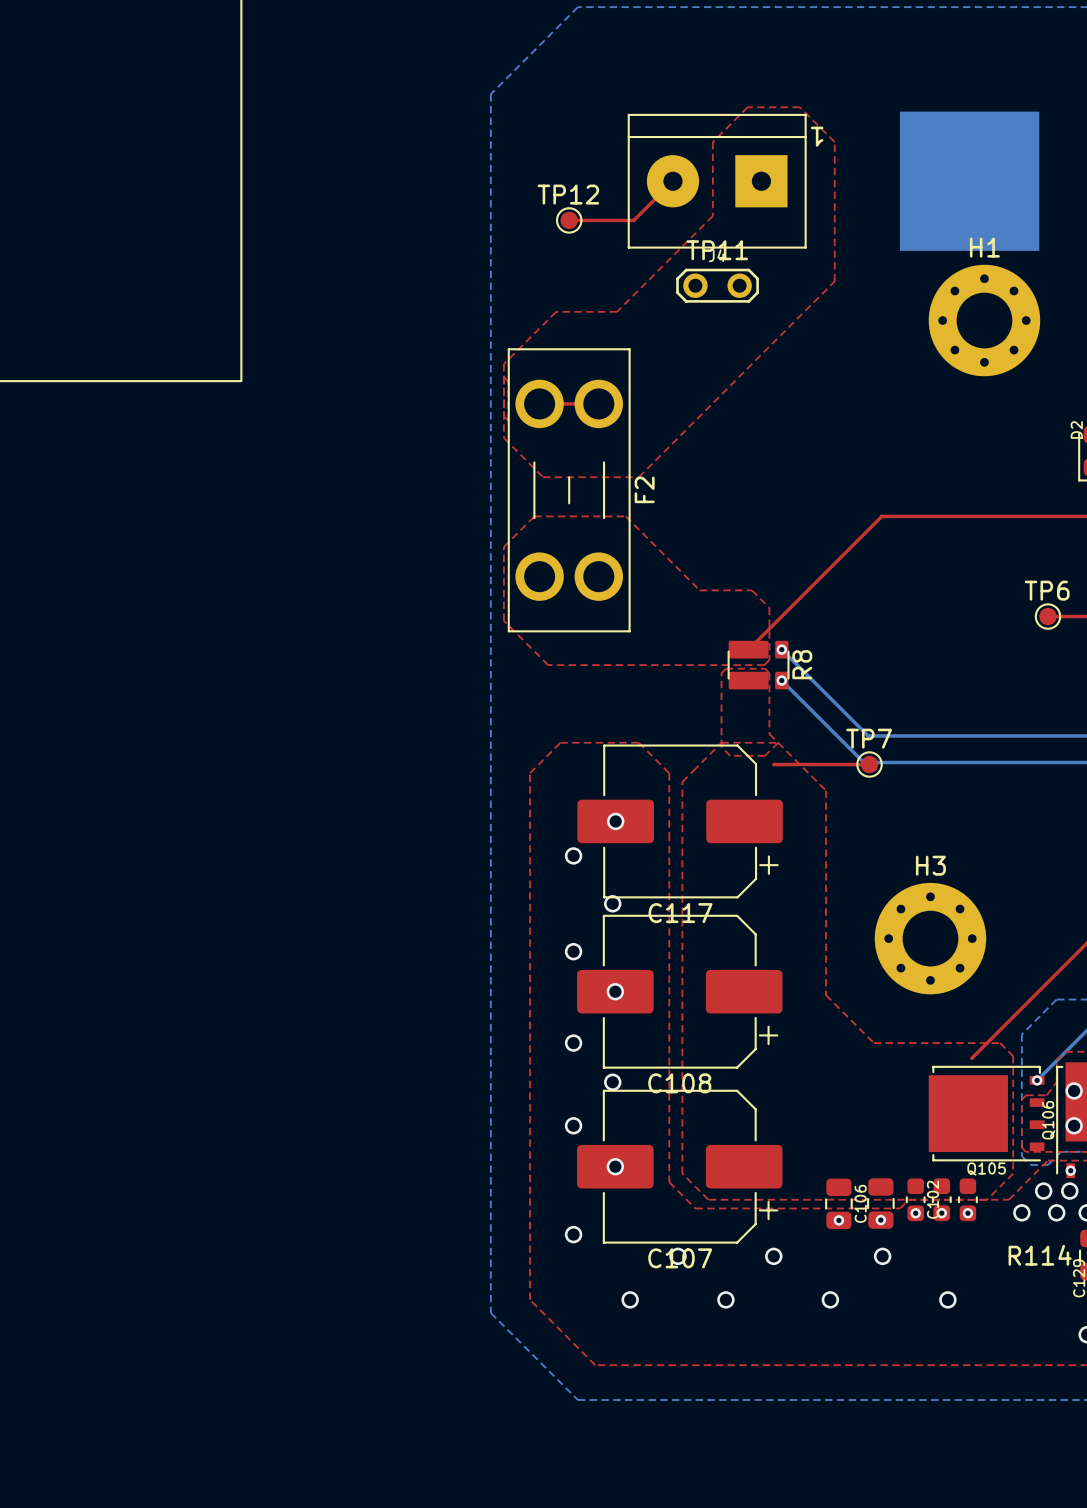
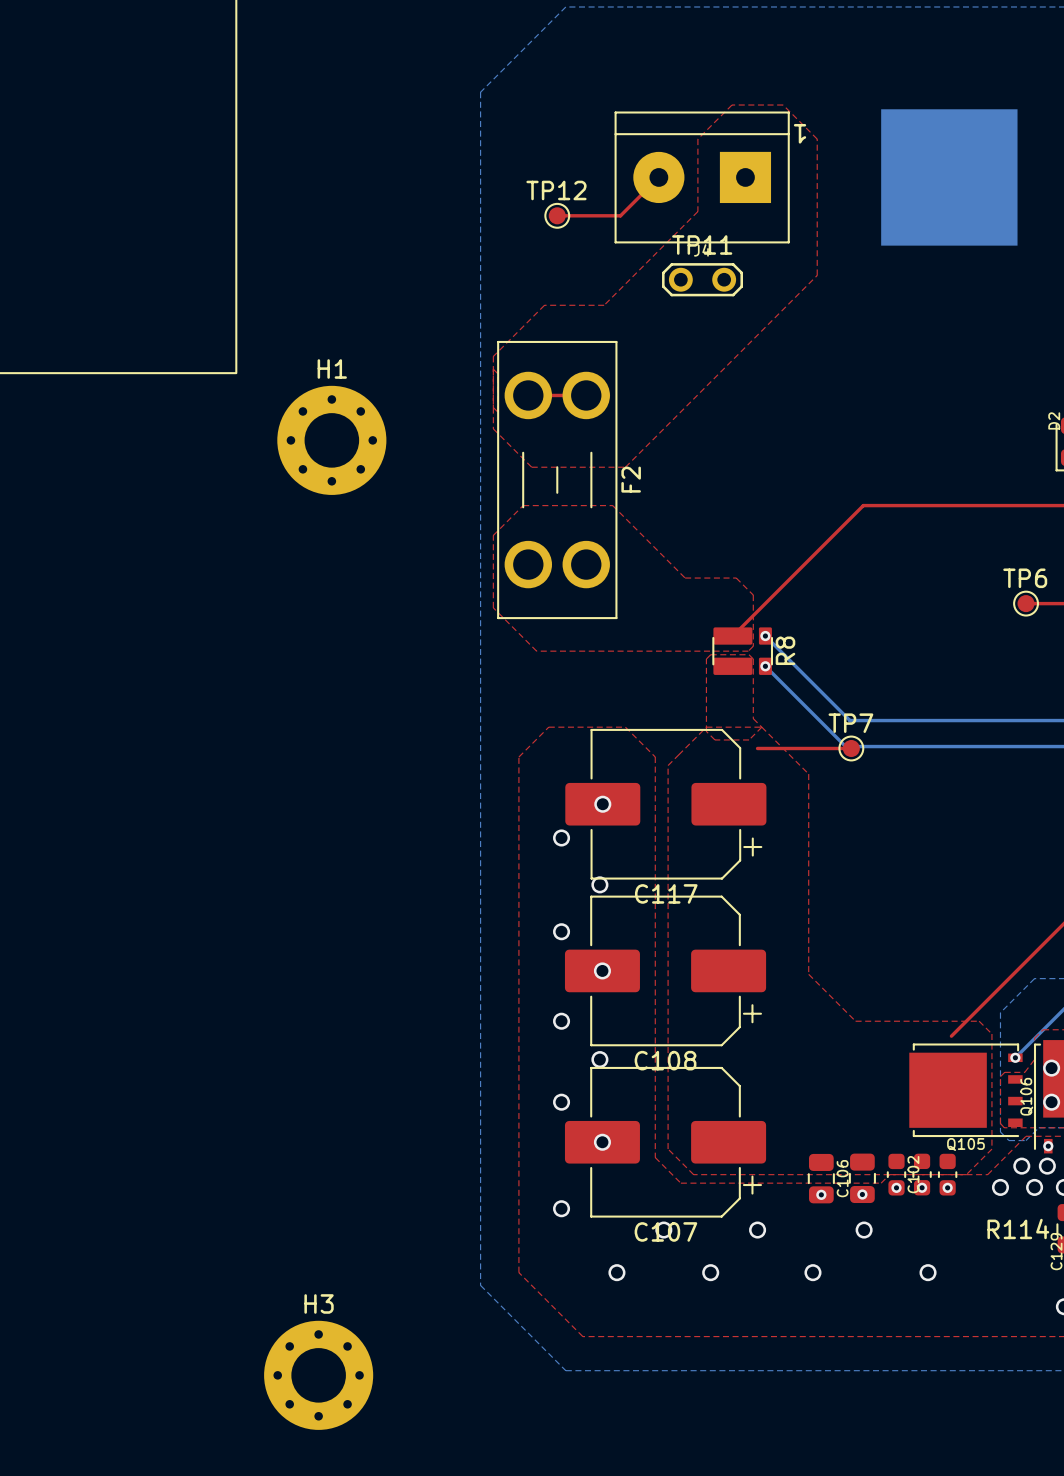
H1 position: (984, 320) -> (331, 440)
H3 position: (930, 938) -> (318, 1375)

